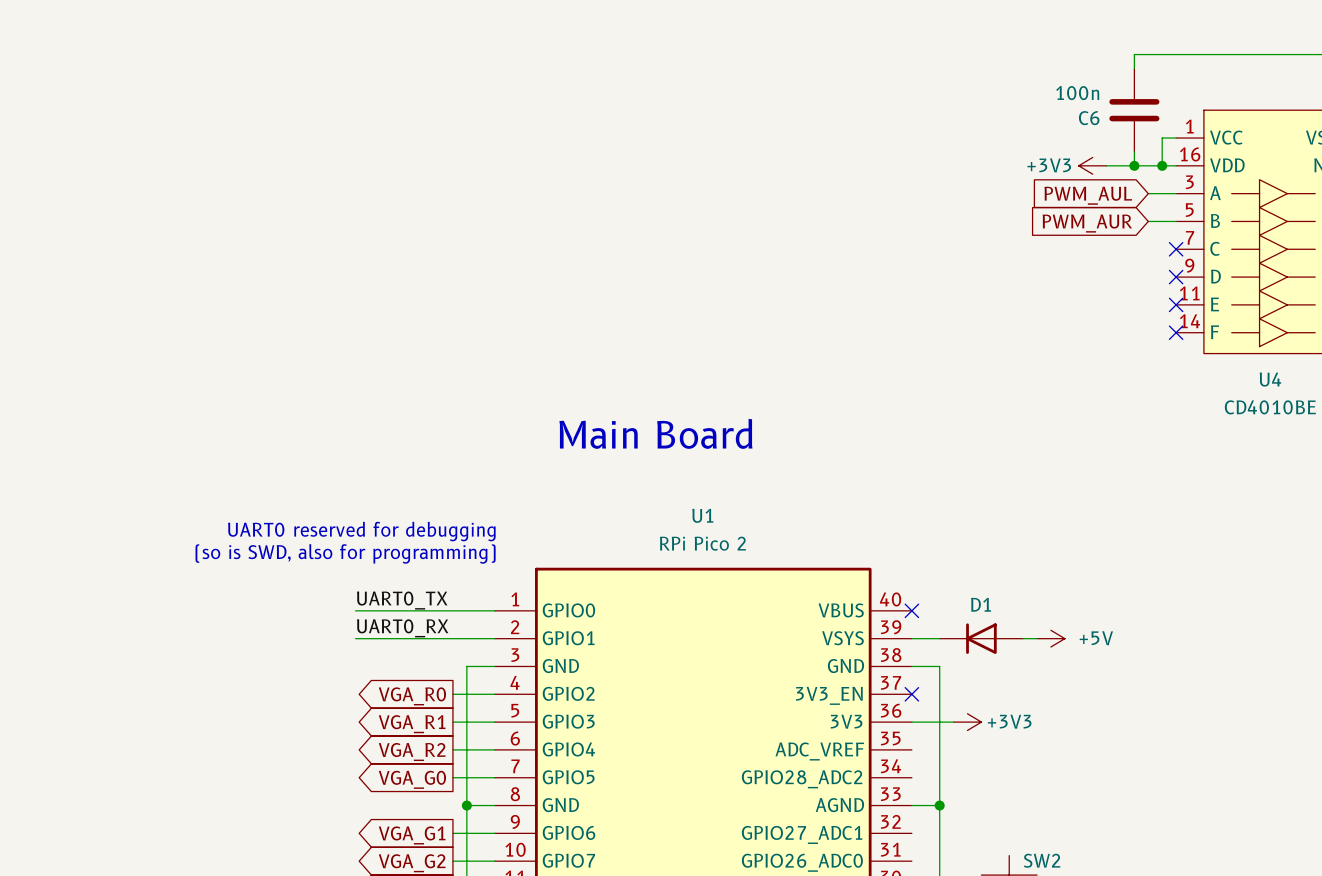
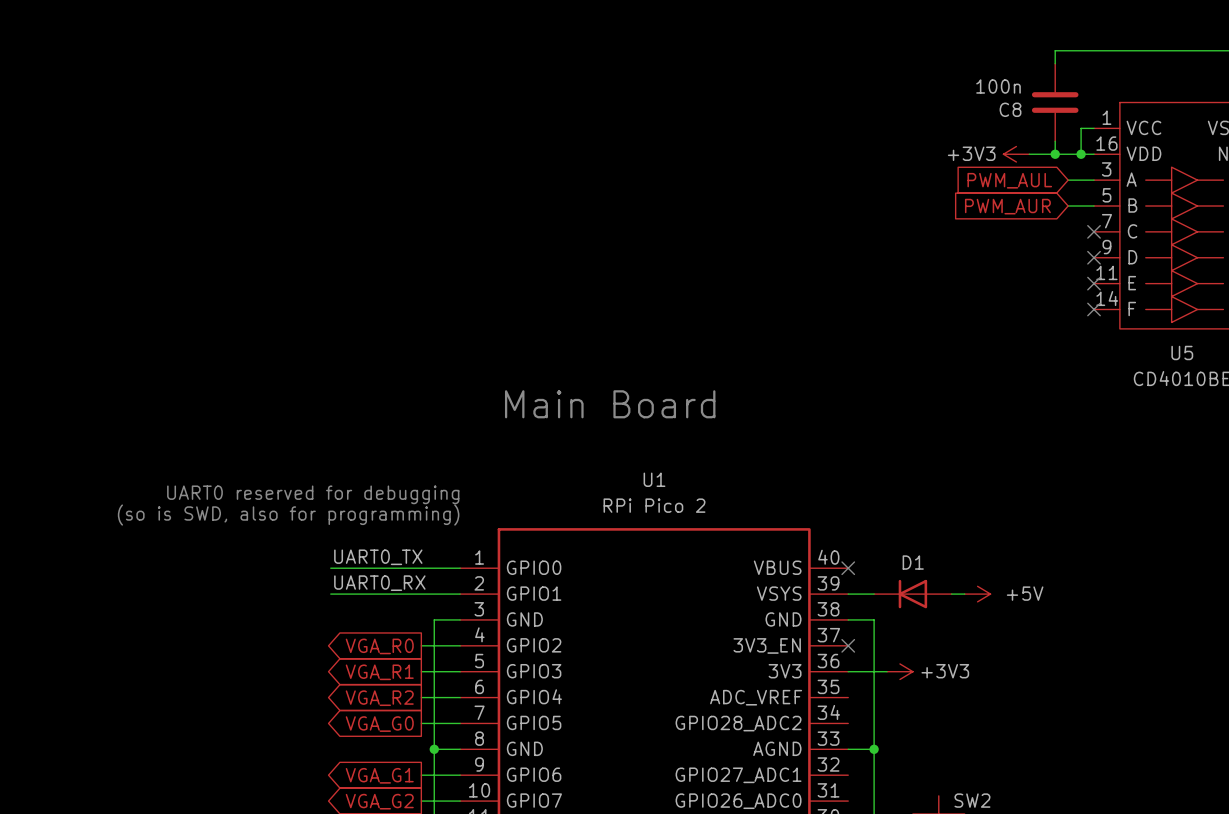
C6 name: C6 (1089, 118) -> C8 (1010, 109)
U4 name: U4 (1270, 379) -> U5 (1182, 352)

